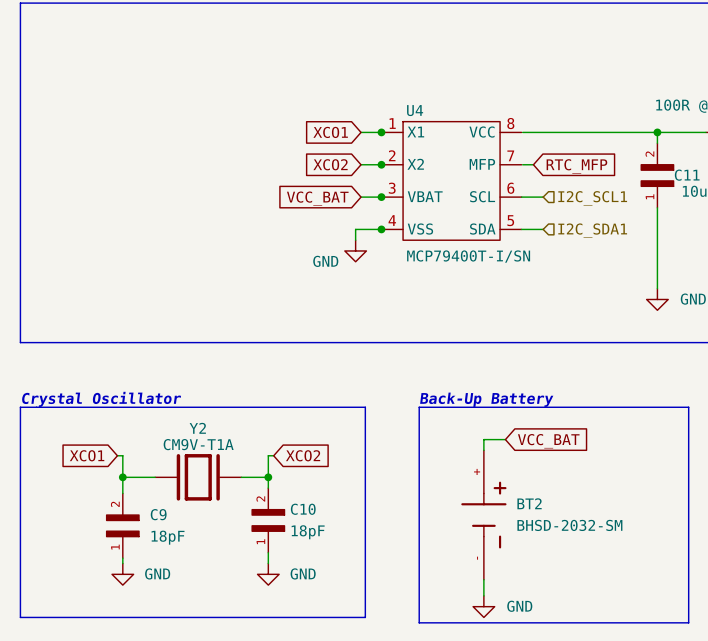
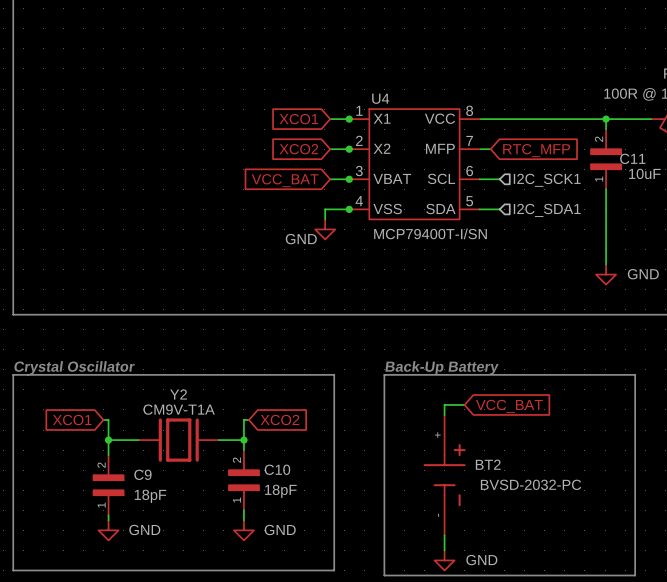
hierarchical label: I2C_SCL1 (592, 198) -> I2C_SCK1 (547, 180)
BT2 value: BHSD-2032-SM (569, 525) -> BVSD-2032-PC (531, 484)

